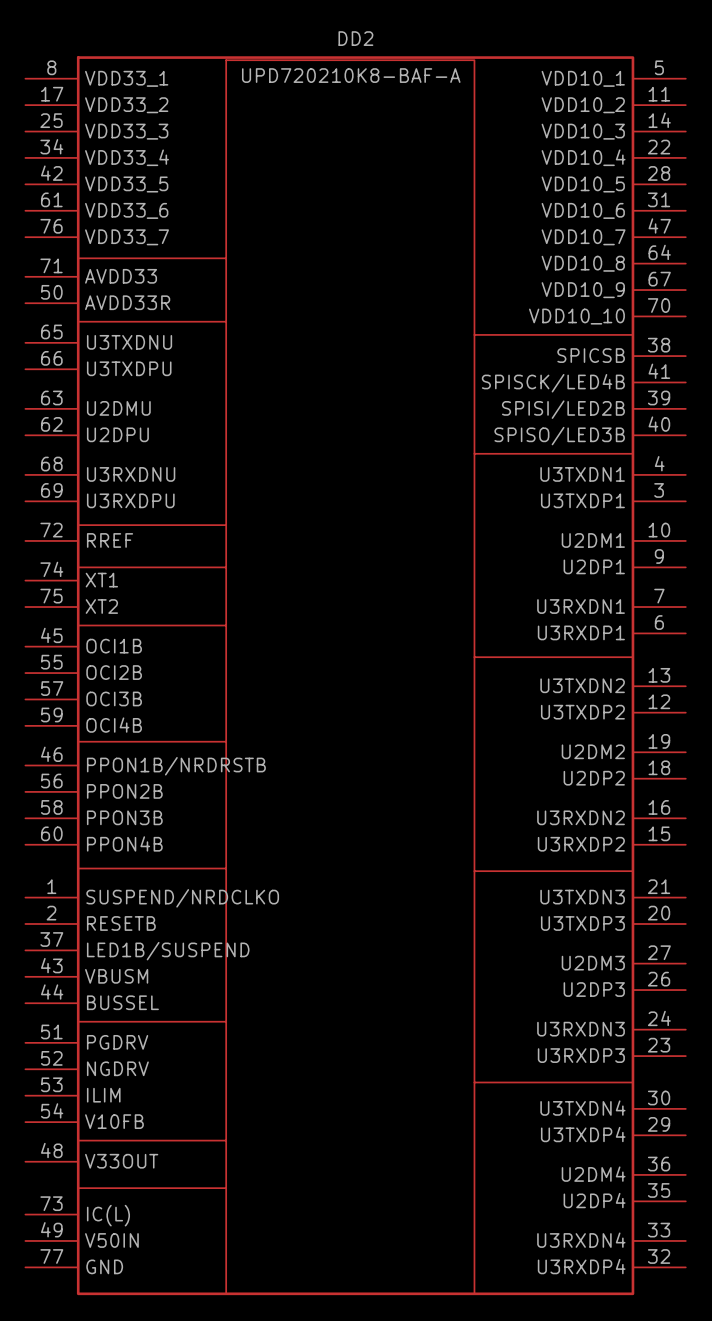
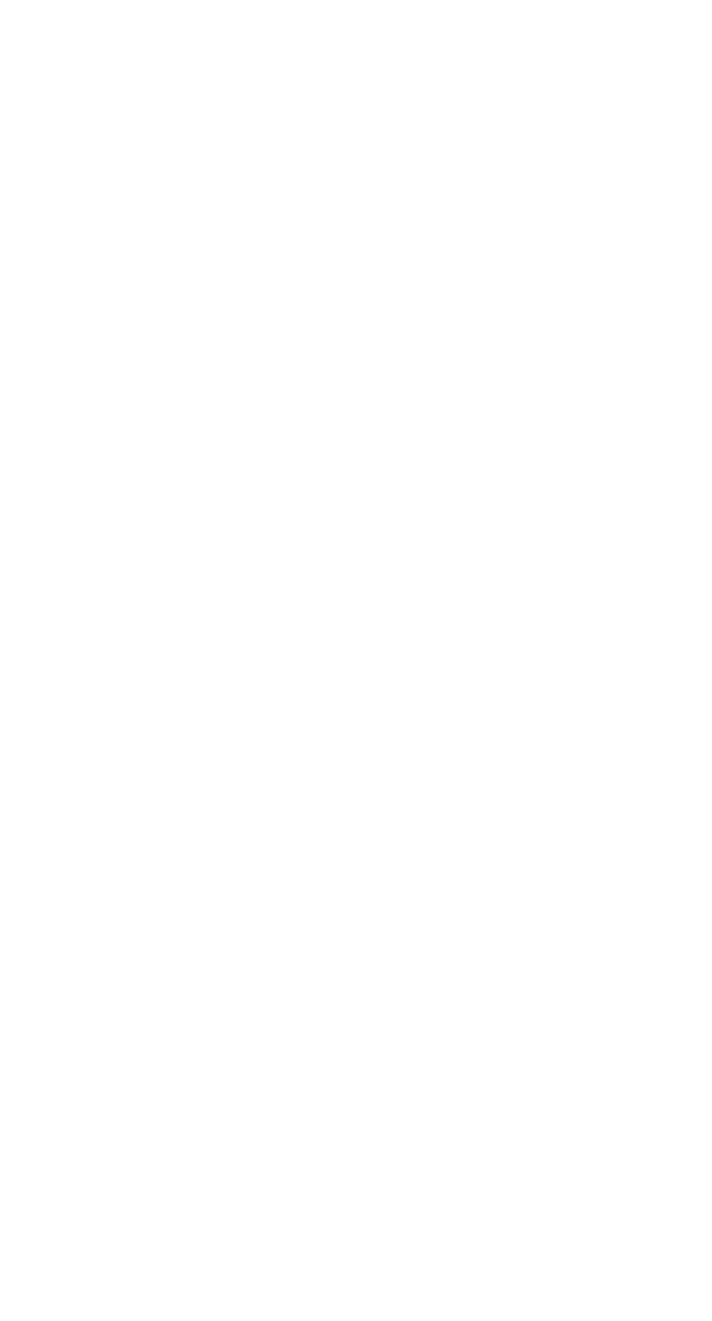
DD2: UPD720210K8-BAF-A (355, 675) -> none

